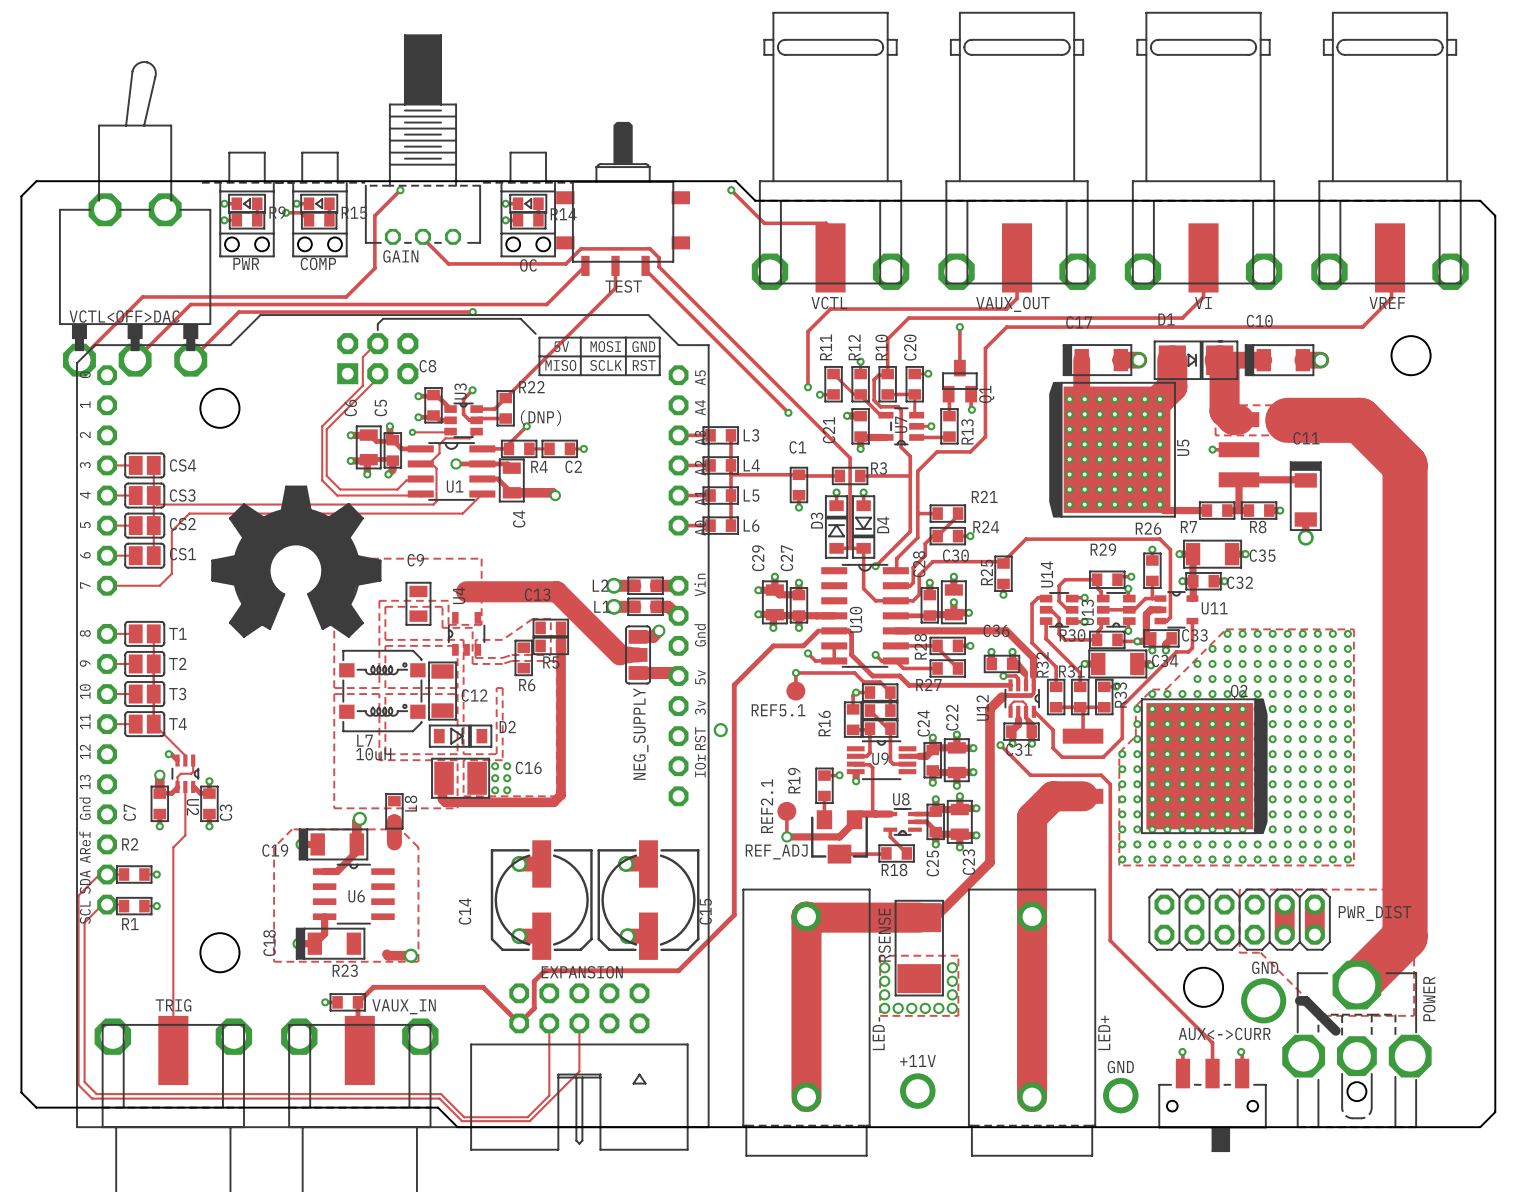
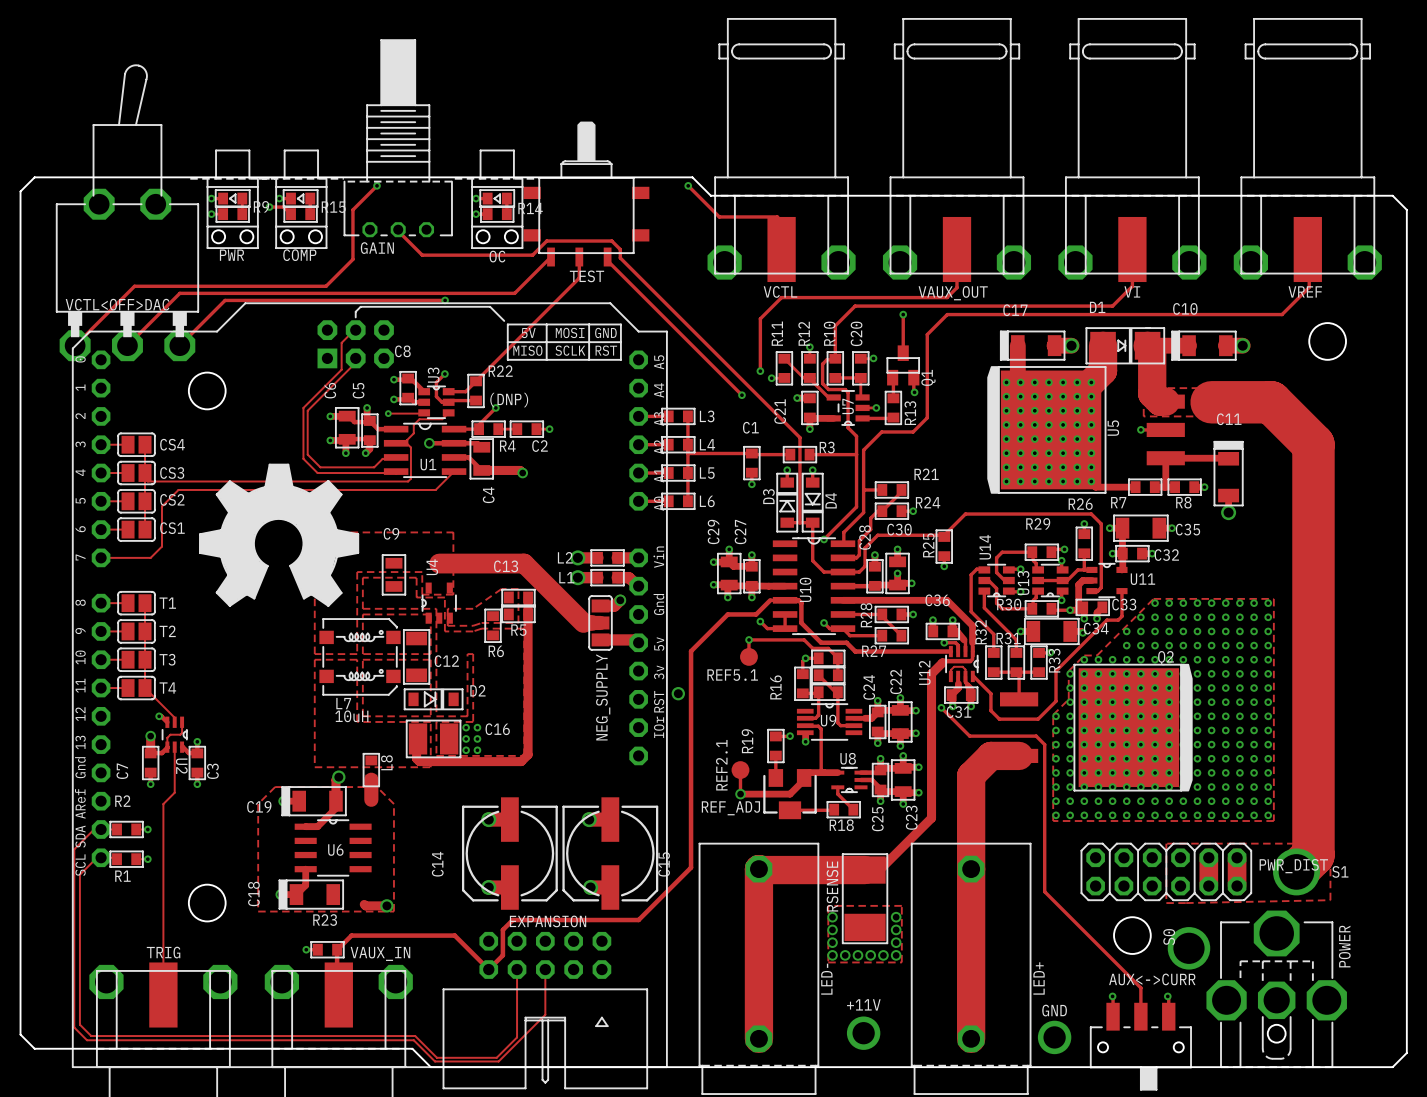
track: (1350, 420) (1359, 420) (1405, 465) (1405, 936) (1356, 985) -> (1271, 402) (1313, 444) (1313, 854) (1296, 871)
via: none -> (1296, 871)
text: none -> S1 (1340, 871)
zone outline: (1414, 949) (1414, 1015) (1323, 1015) (1260, 952) -> (1330, 900) (1186, 903)
text: GND (1265, 967) -> none
text: none -> S0 (1169, 937)
line: (1299, 1000) (1305, 1000) (1335, 1030) -> none

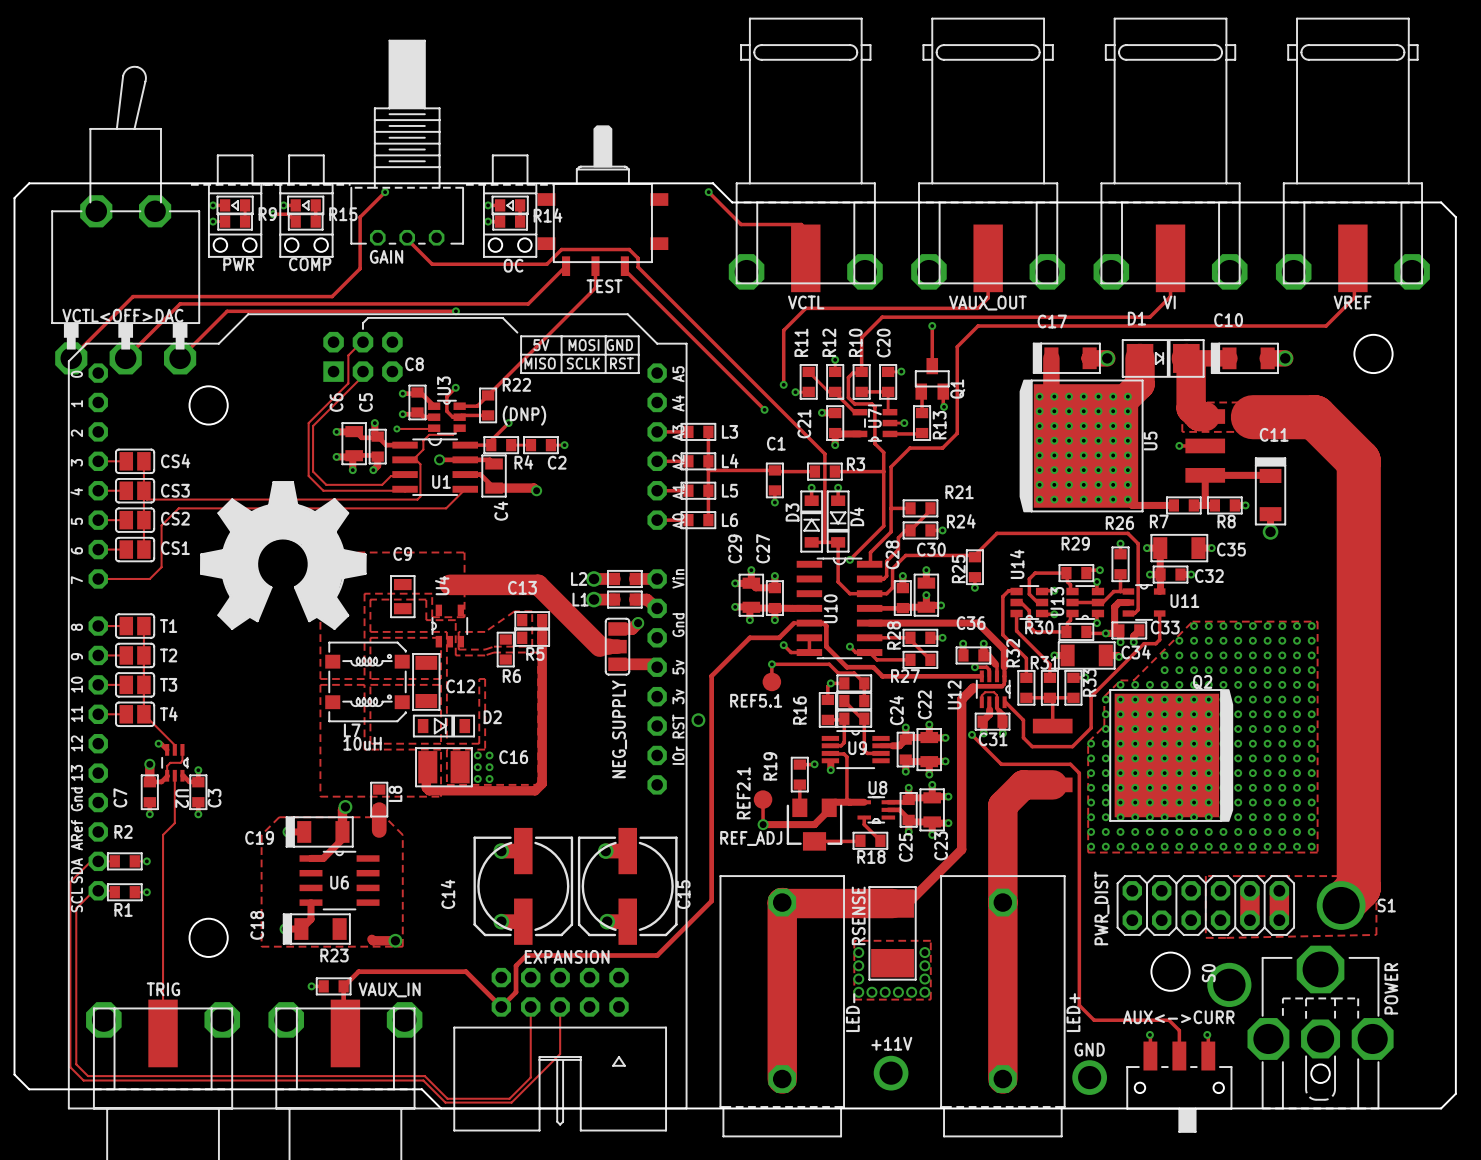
PWR_DIST name rotation: 0° (1293, 866) -> 90° counterclockwise (1101, 908)
PWR_DIST name position: PWR_DIST (1293, 866) -> PWR_DIST (1101, 908)
track: (1044, 891) (1140, 987) (1140, 992) -> (1079, 926) (1079, 1005) (1094, 1020) (1169, 1020) (1179, 1030)

